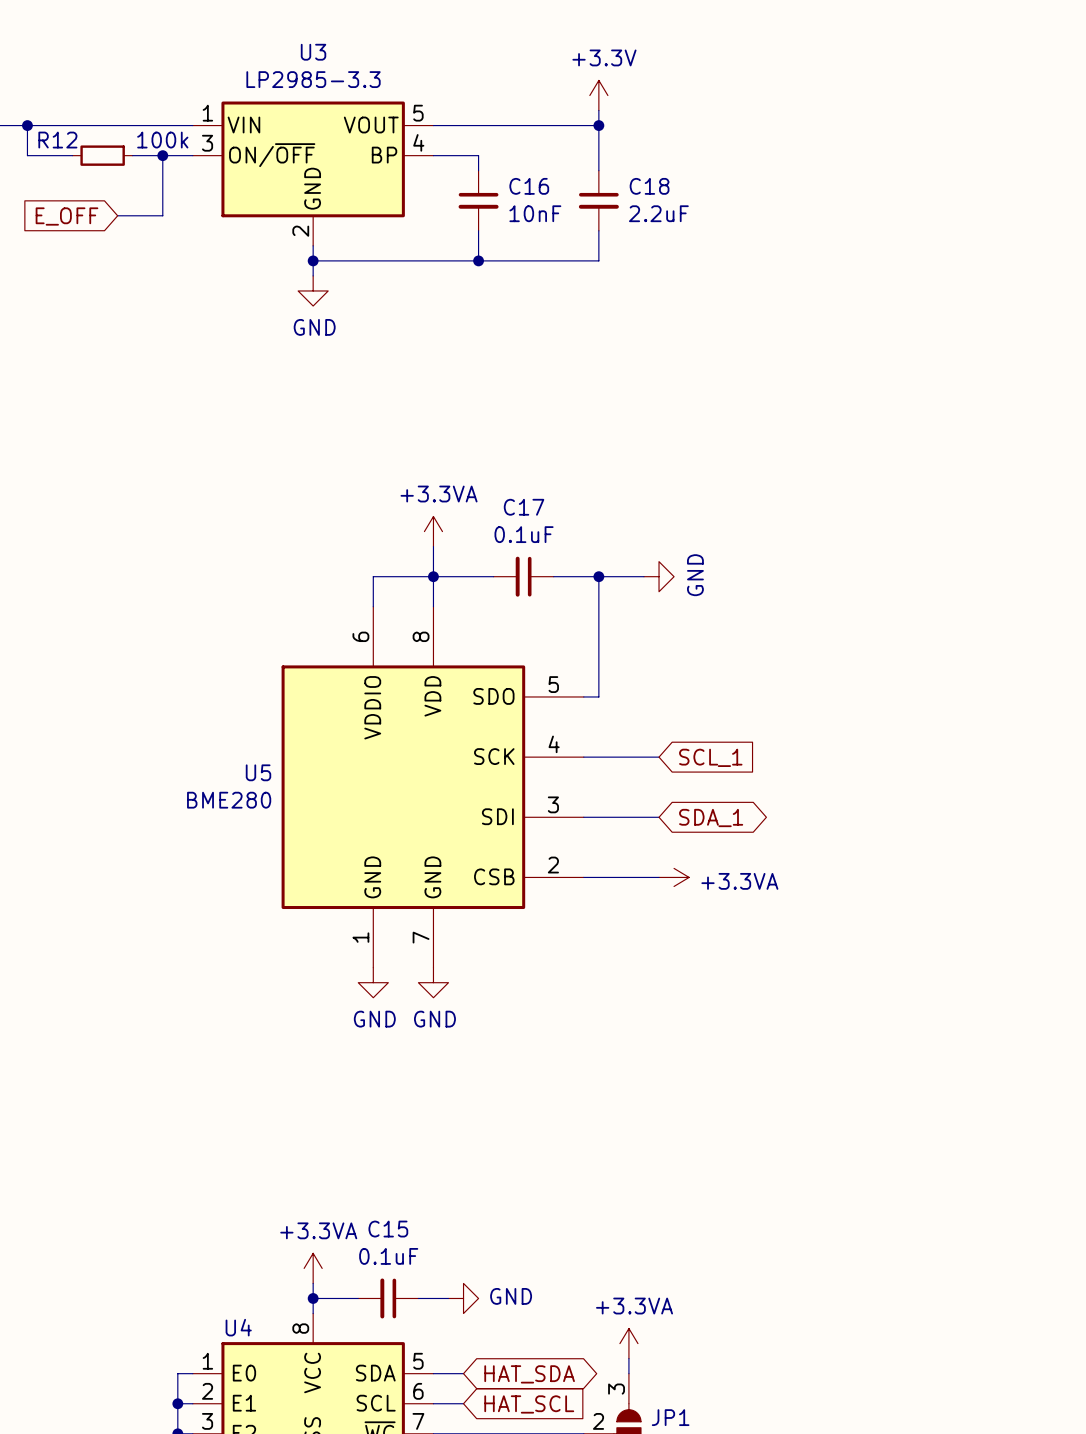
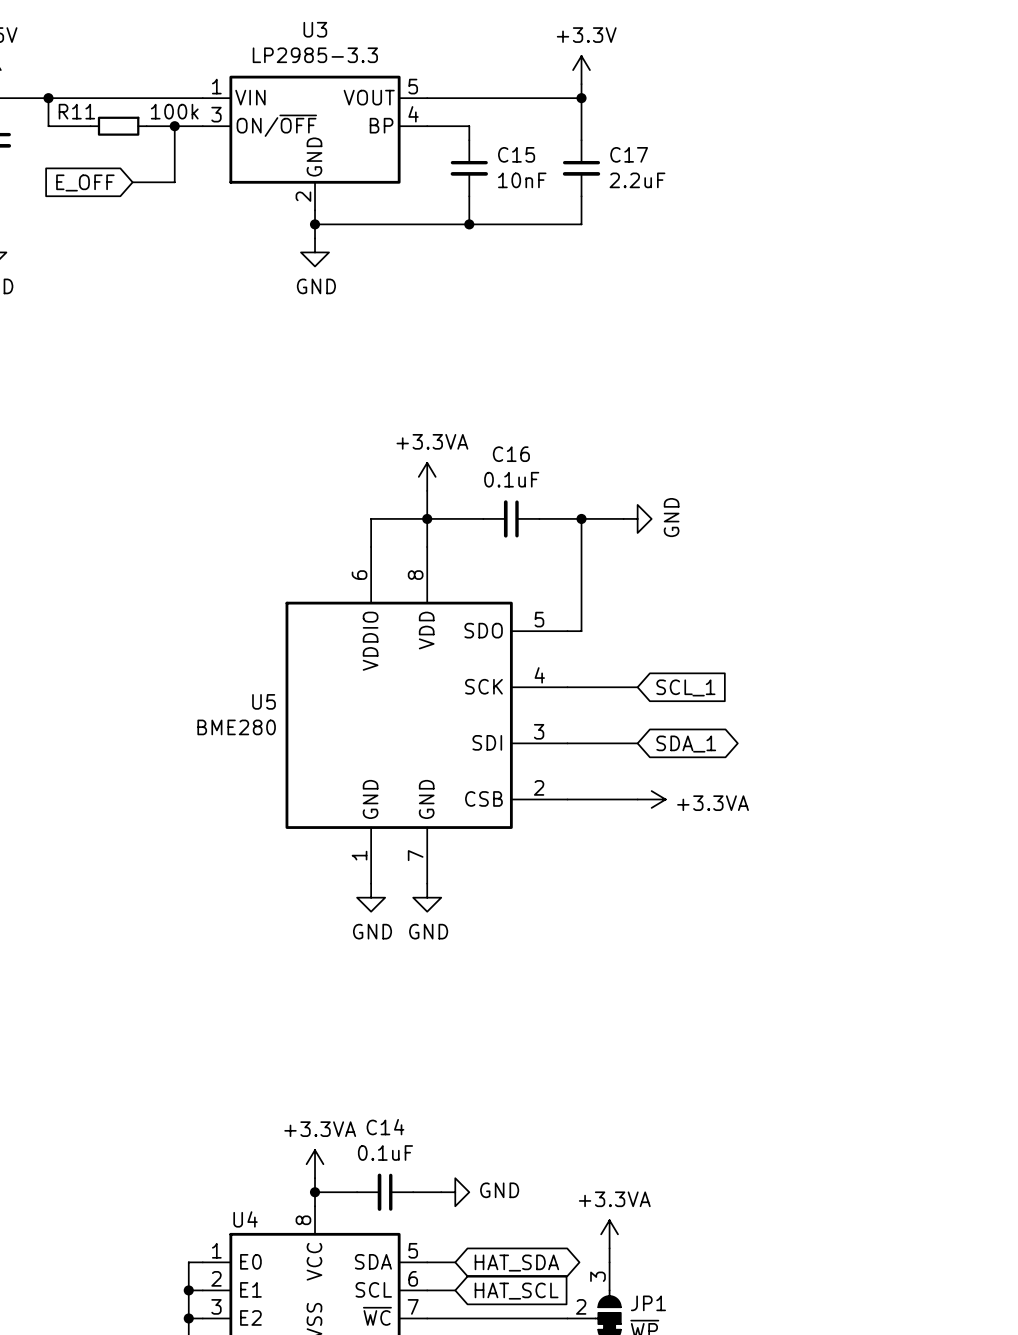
R12 name: R12 (57, 140) -> R11 (76, 111)
C16 name: C16 (529, 186) -> C15 (516, 154)
C18 name: C18 (649, 186) -> C17 (629, 154)
C17 name: C17 (524, 507) -> C16 (511, 454)
C15 name: C15 (388, 1229) -> C14 (385, 1127)

